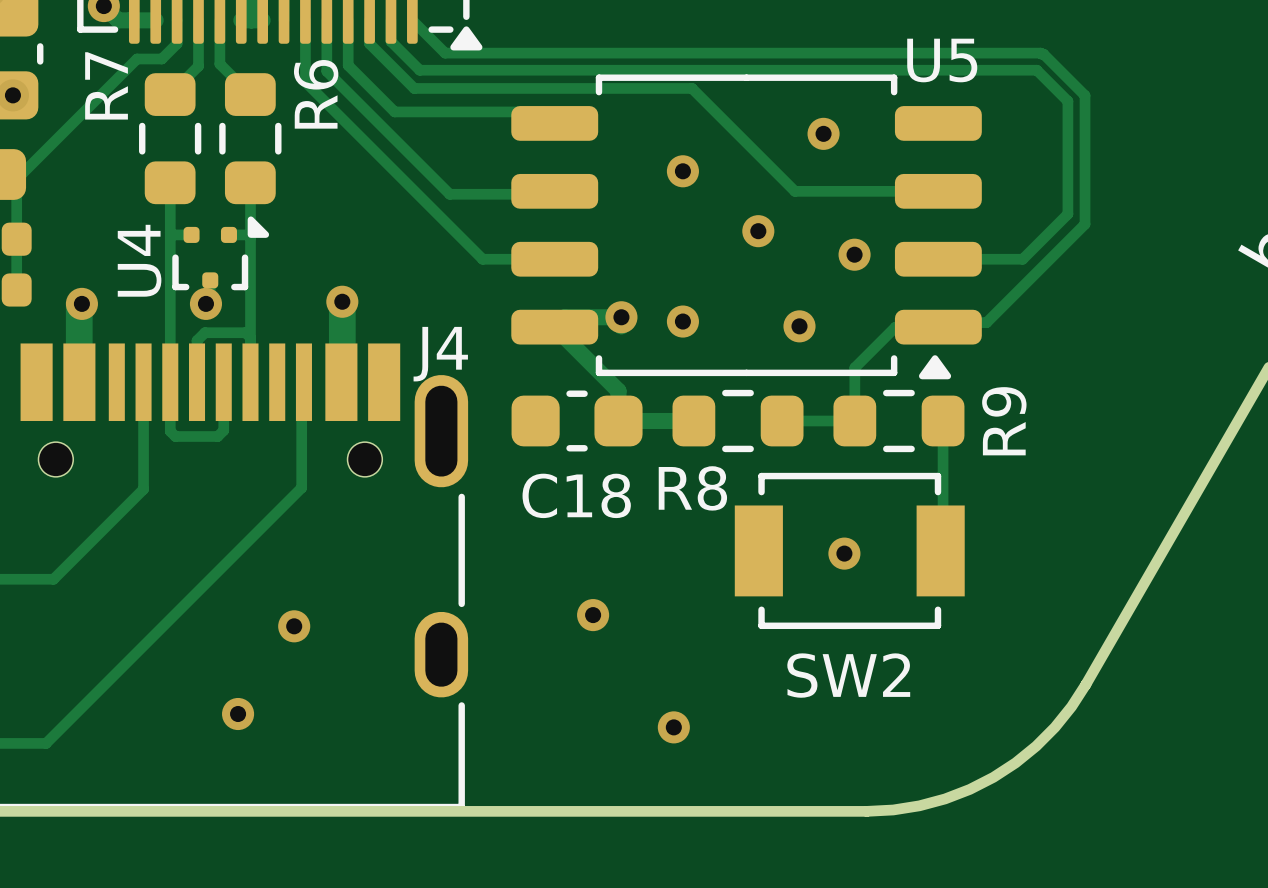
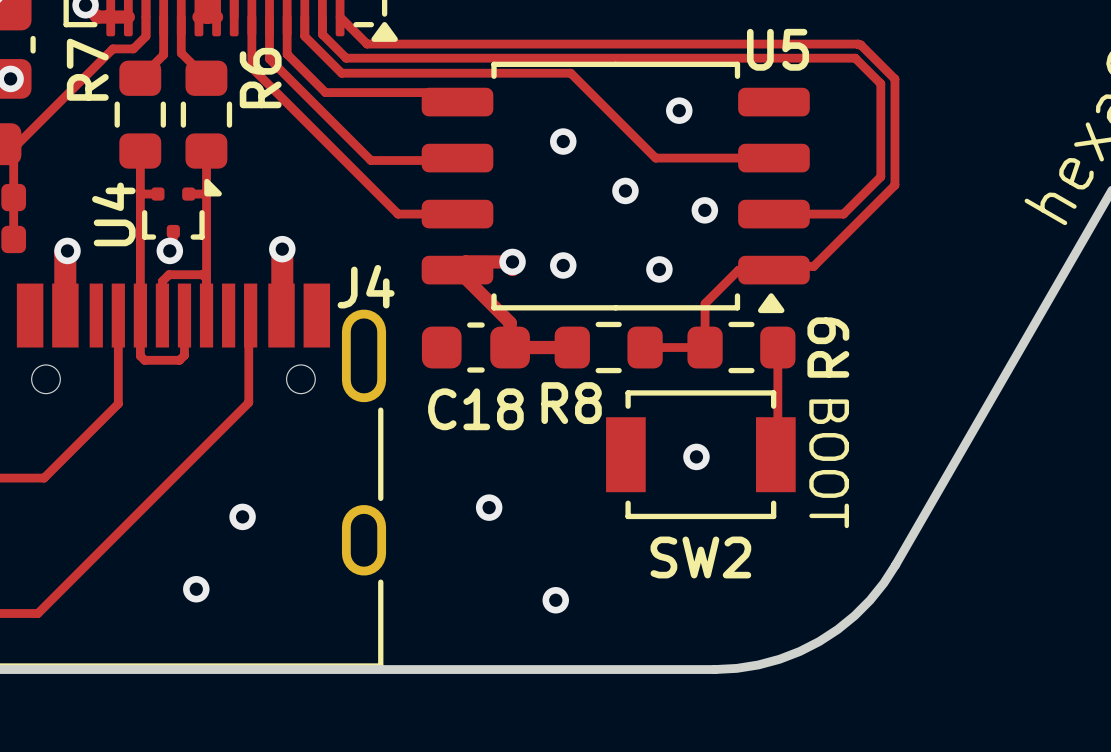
text: none -> BOOT (829, 463)

